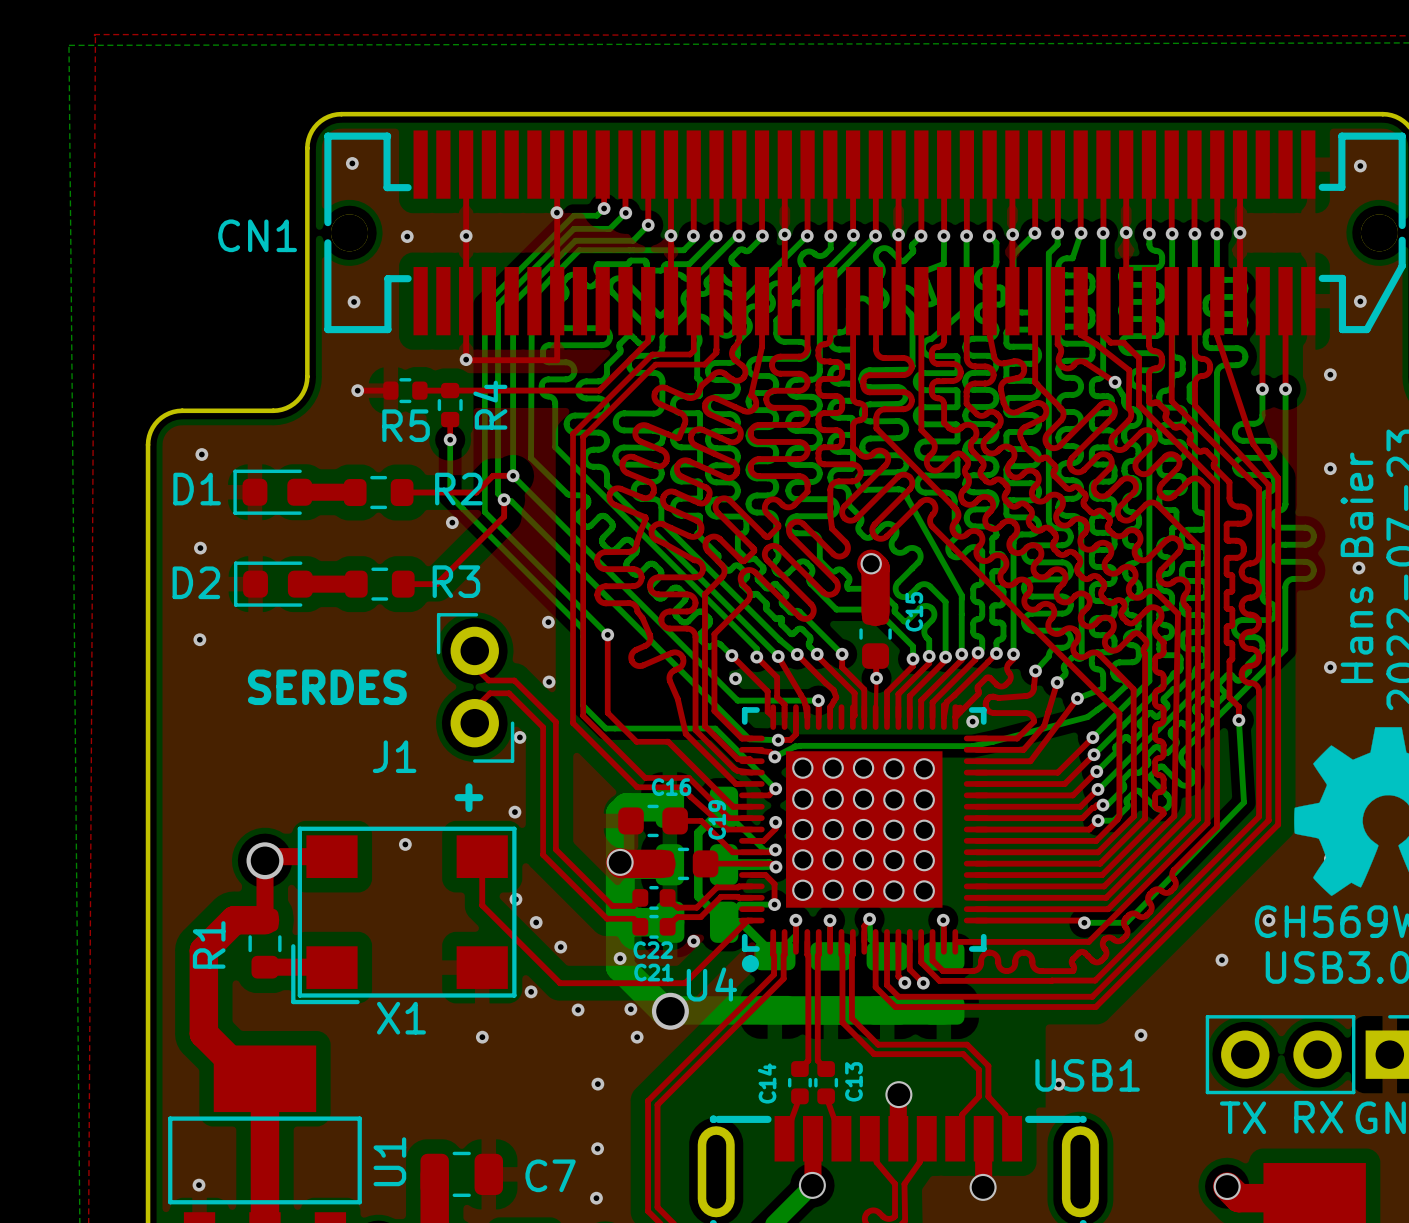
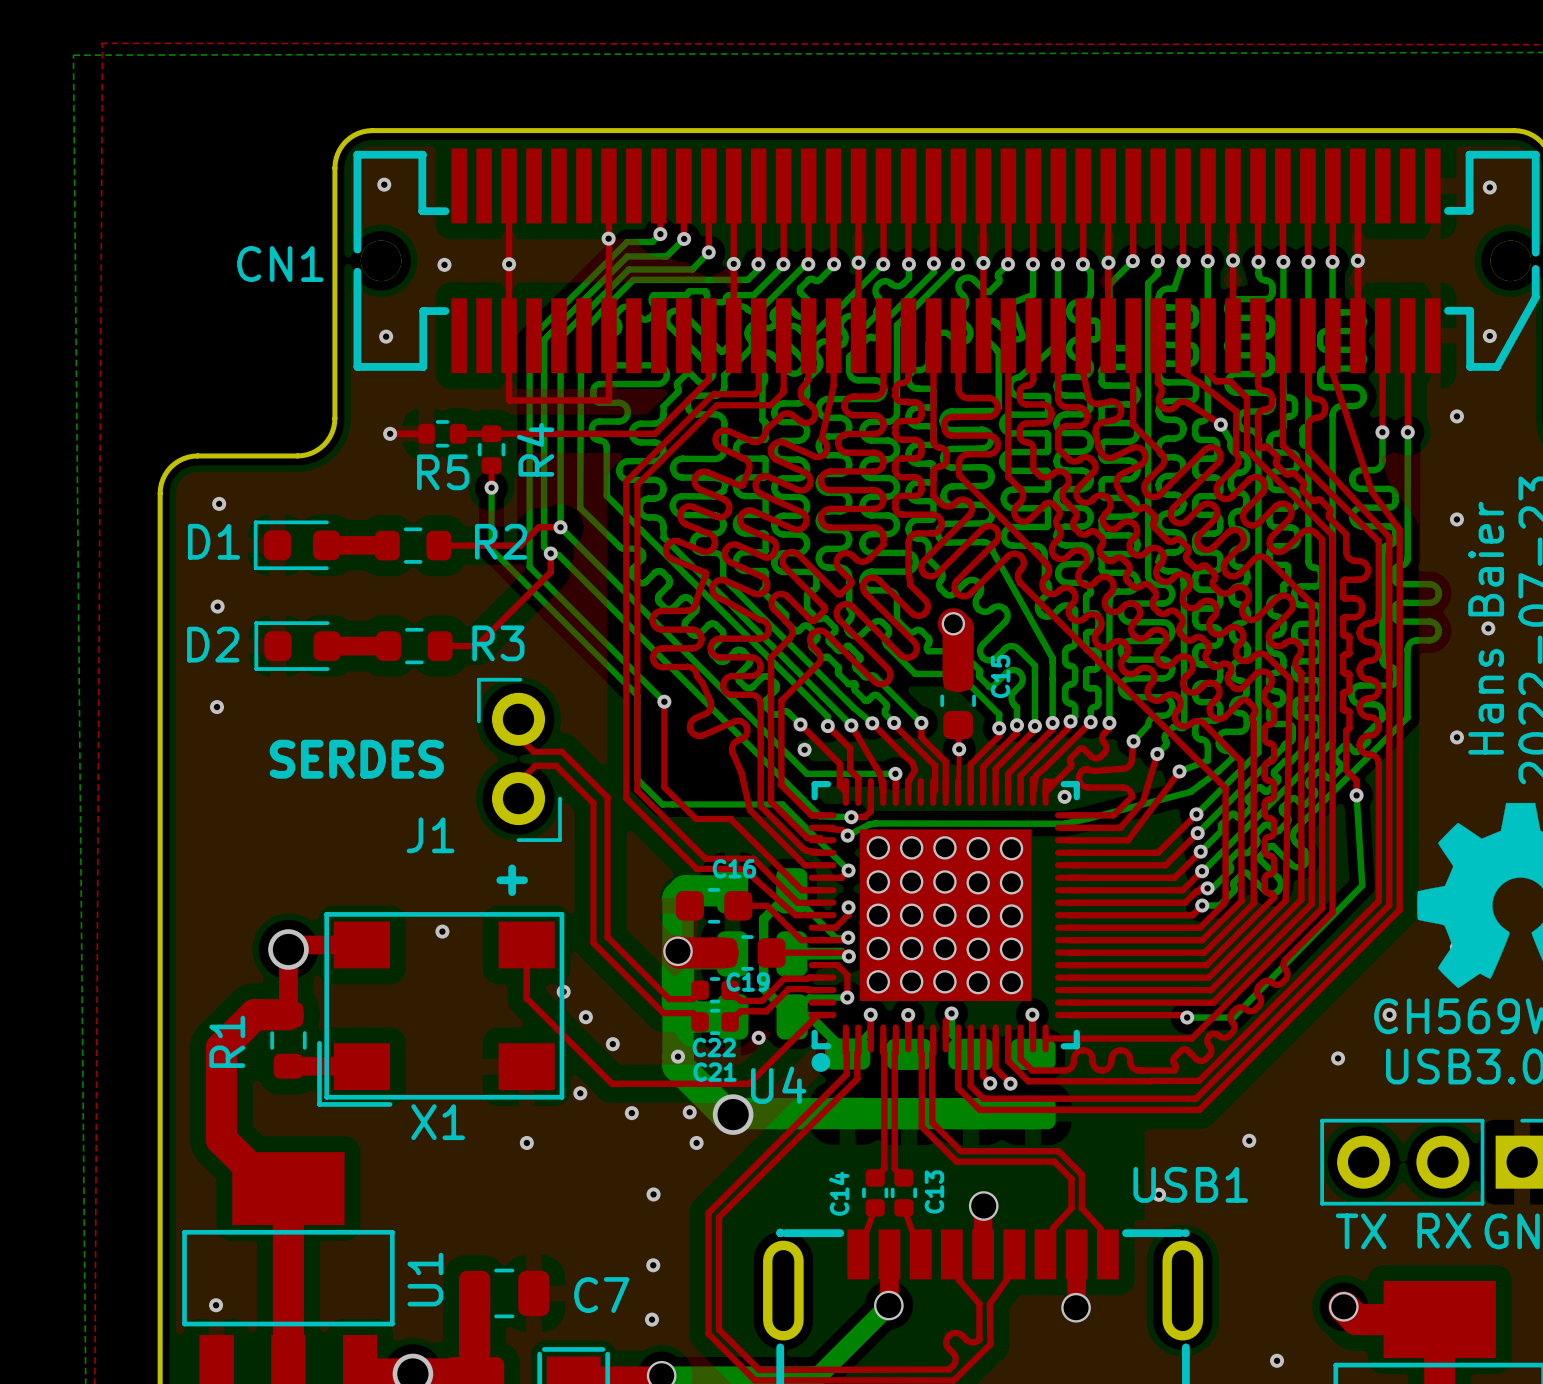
via: (466, 359) -> none
via: (452, 522) -> none
via: (548, 622) -> none
via: (549, 681) -> none
via: (519, 737) -> none
via: (514, 812) -> none
C19 name rotation: 0° (717, 819) -> 90° clockwise (748, 982)
C19 name position: C19 (717, 819) -> C19 (748, 982)

